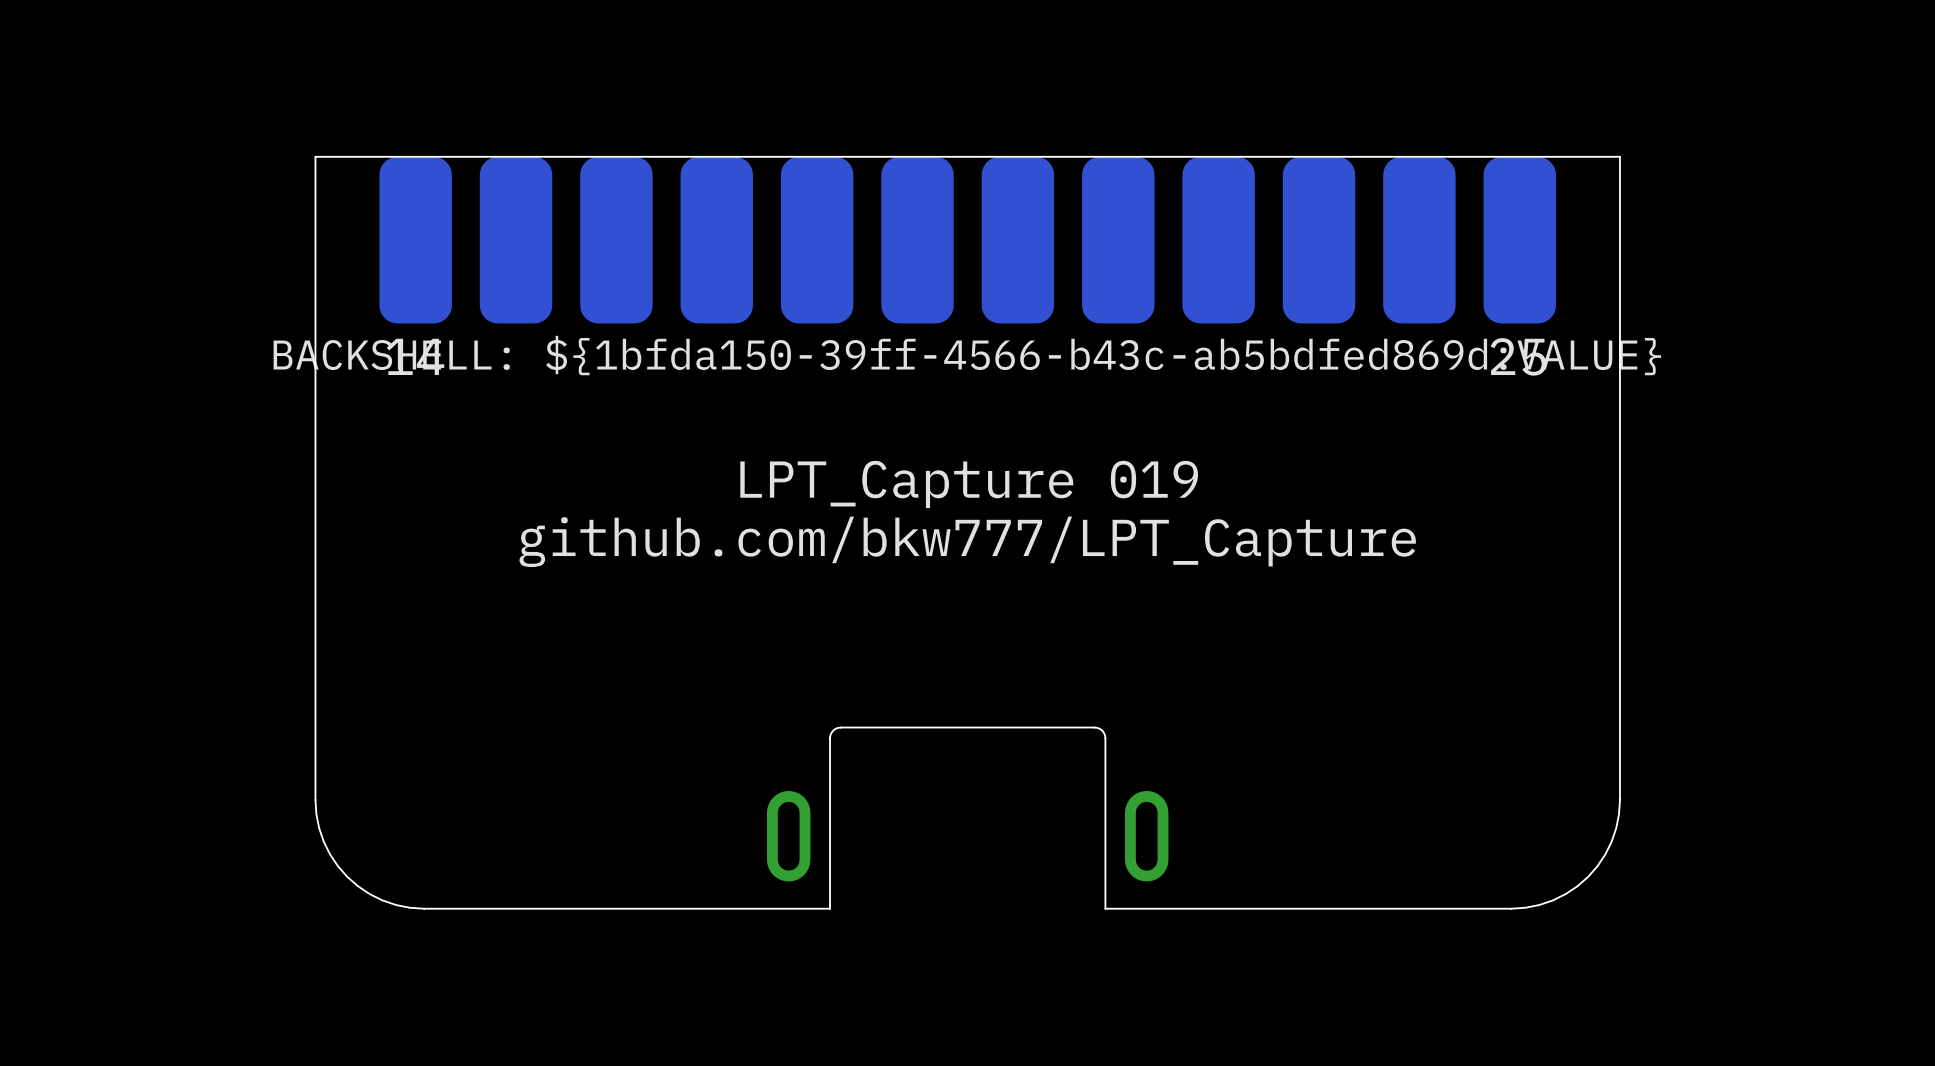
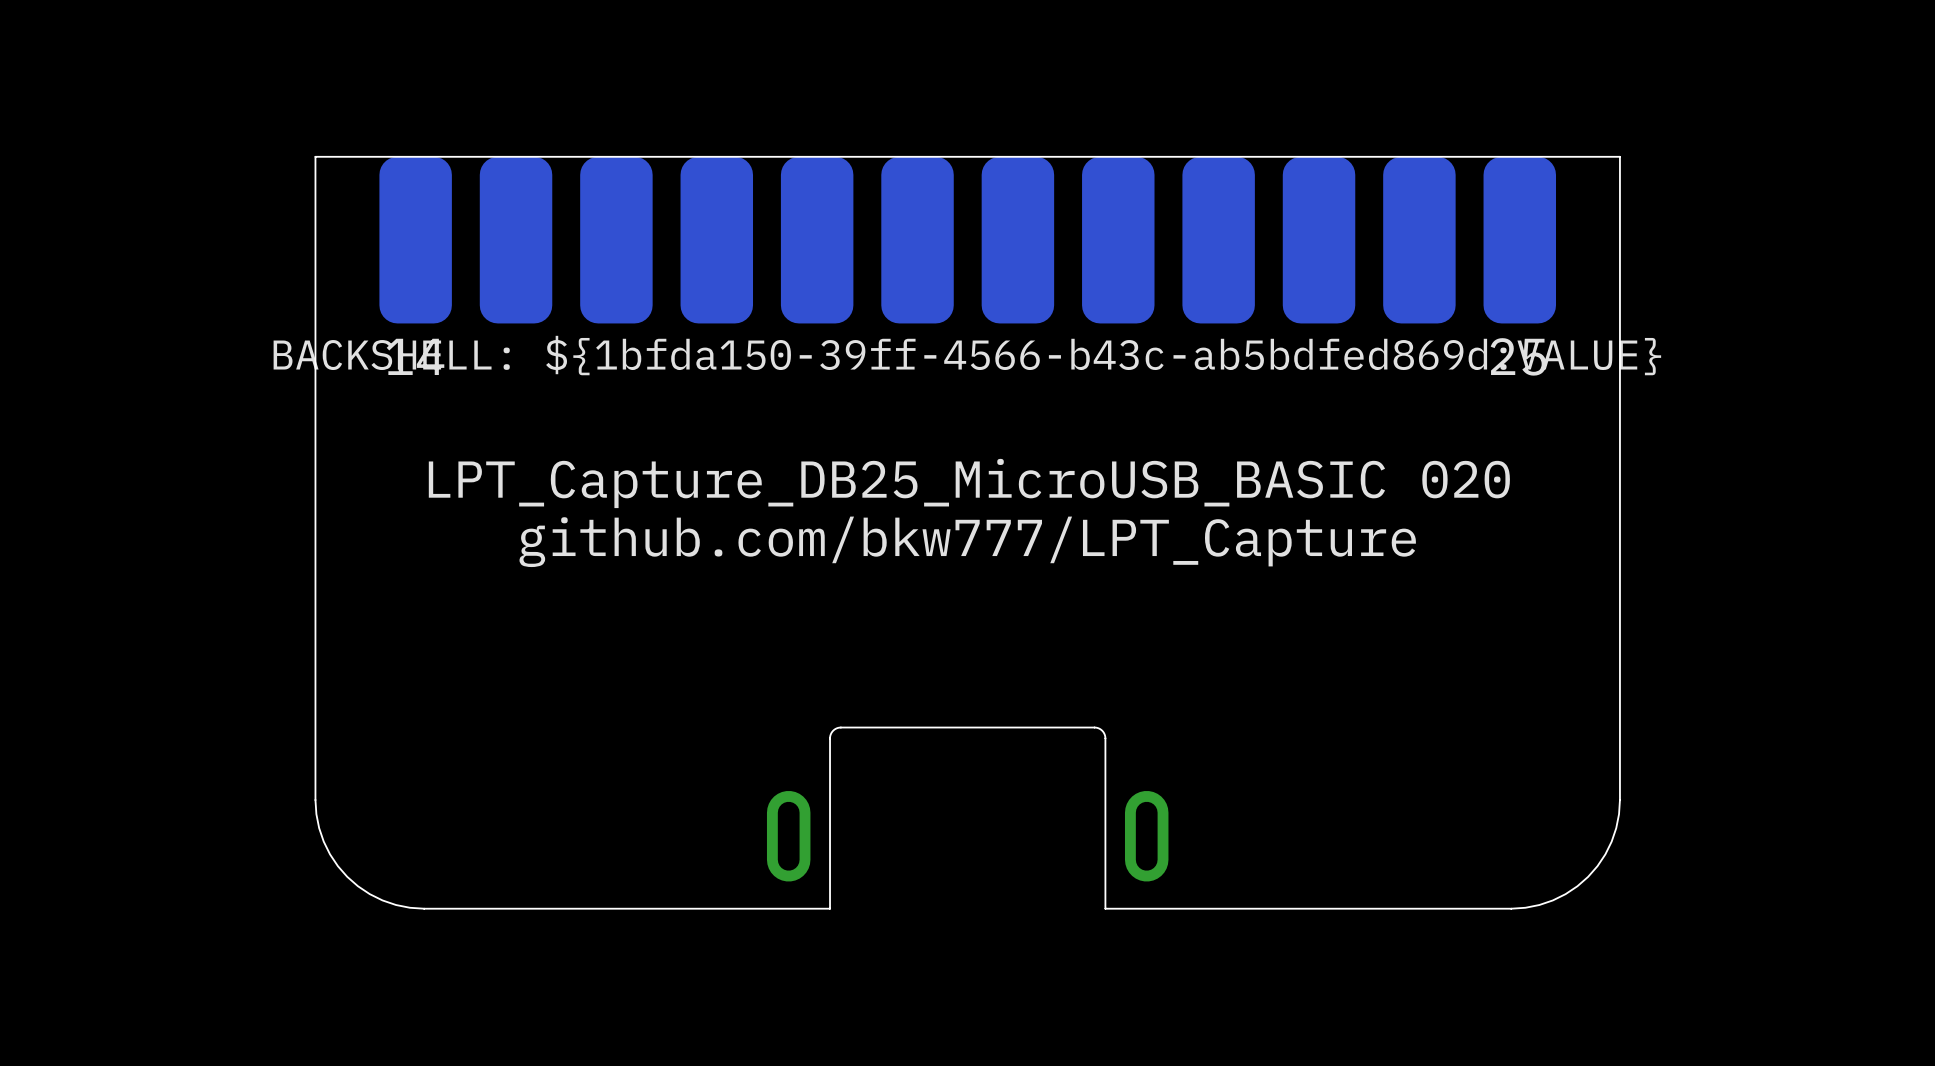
text: LPT_Capture 019 (969, 484) -> LPT_Capture_DB25_MicroUSB_BASIC 020 (969, 483)

